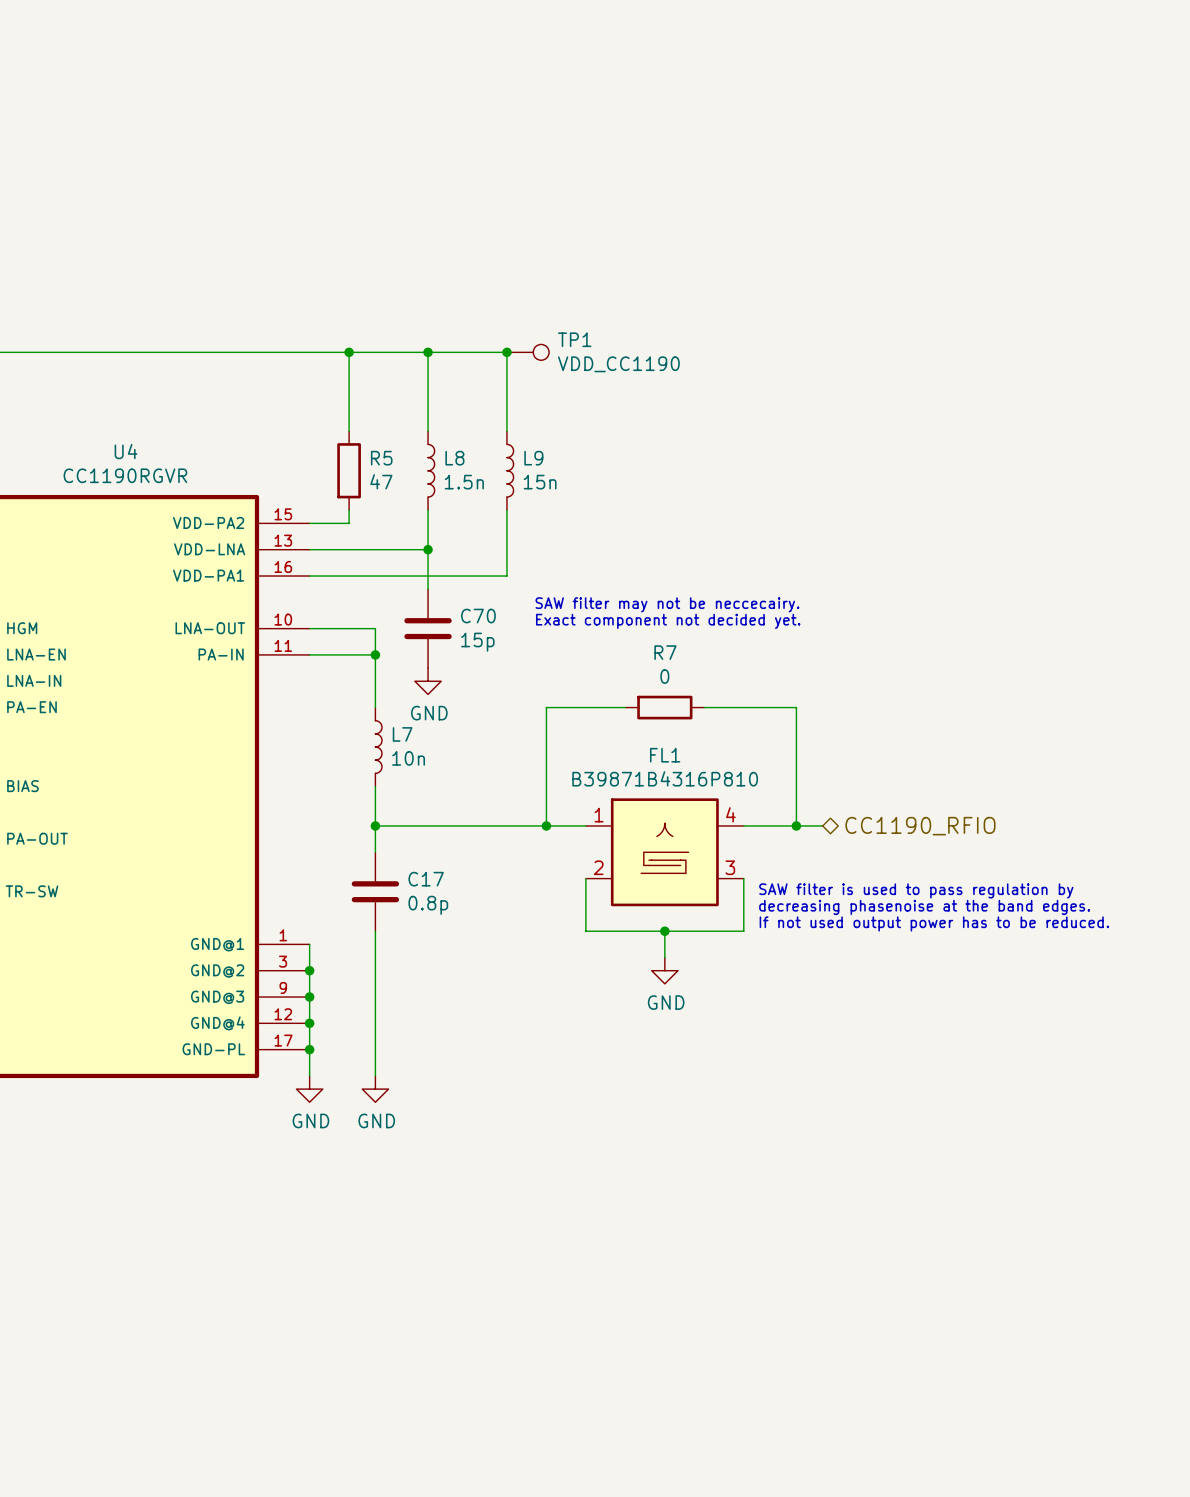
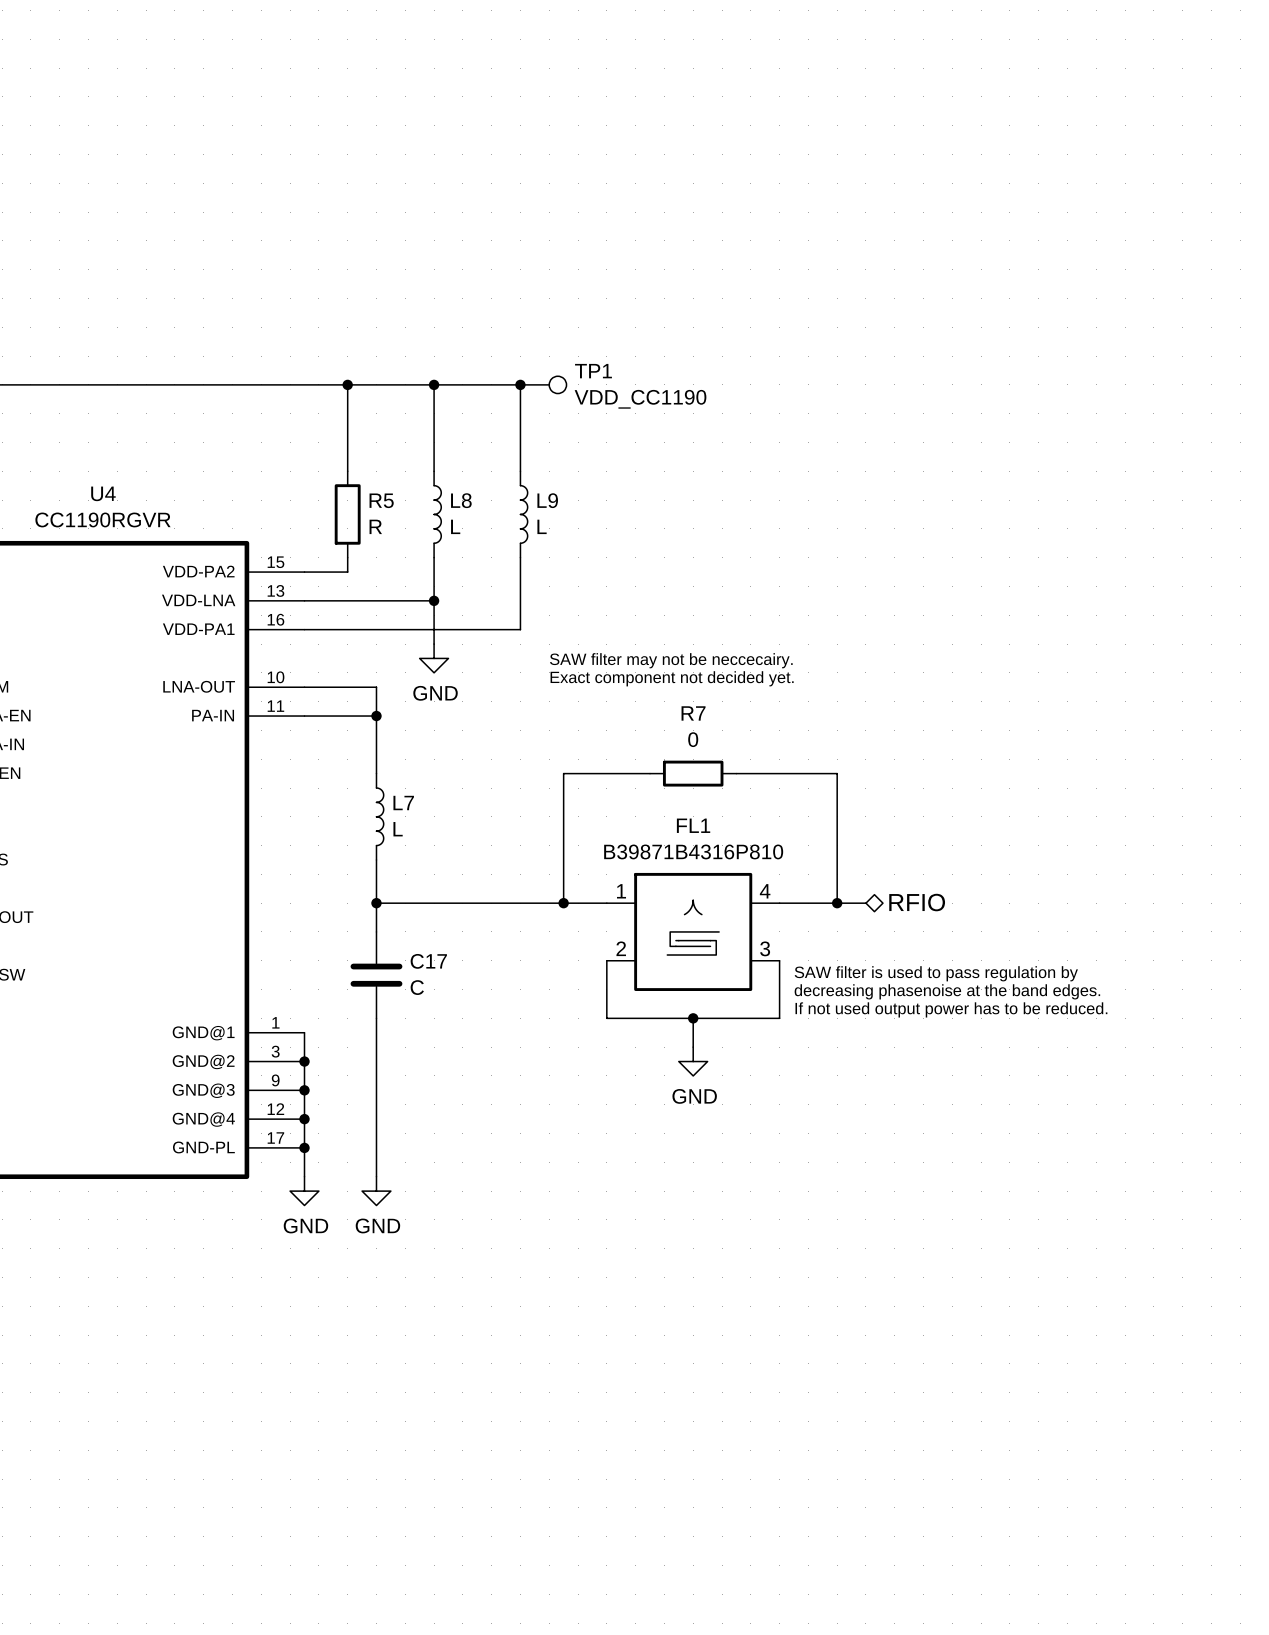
R5 value: 47 (381, 481) -> R (375, 526)
L8 value: 1.5n (464, 482) -> L (455, 526)
L9 value: 15n (540, 482) -> L (542, 526)
C70: 15p (428, 628) -> none
power symbol position: GND (428, 681) -> GND (434, 658)
L7 value: 10n (408, 758) -> L (398, 829)
hierarchical label: CC1190_RFIO (920, 826) -> RFIO (917, 902)
C17 value: 0.8p (428, 905) -> C (417, 987)

